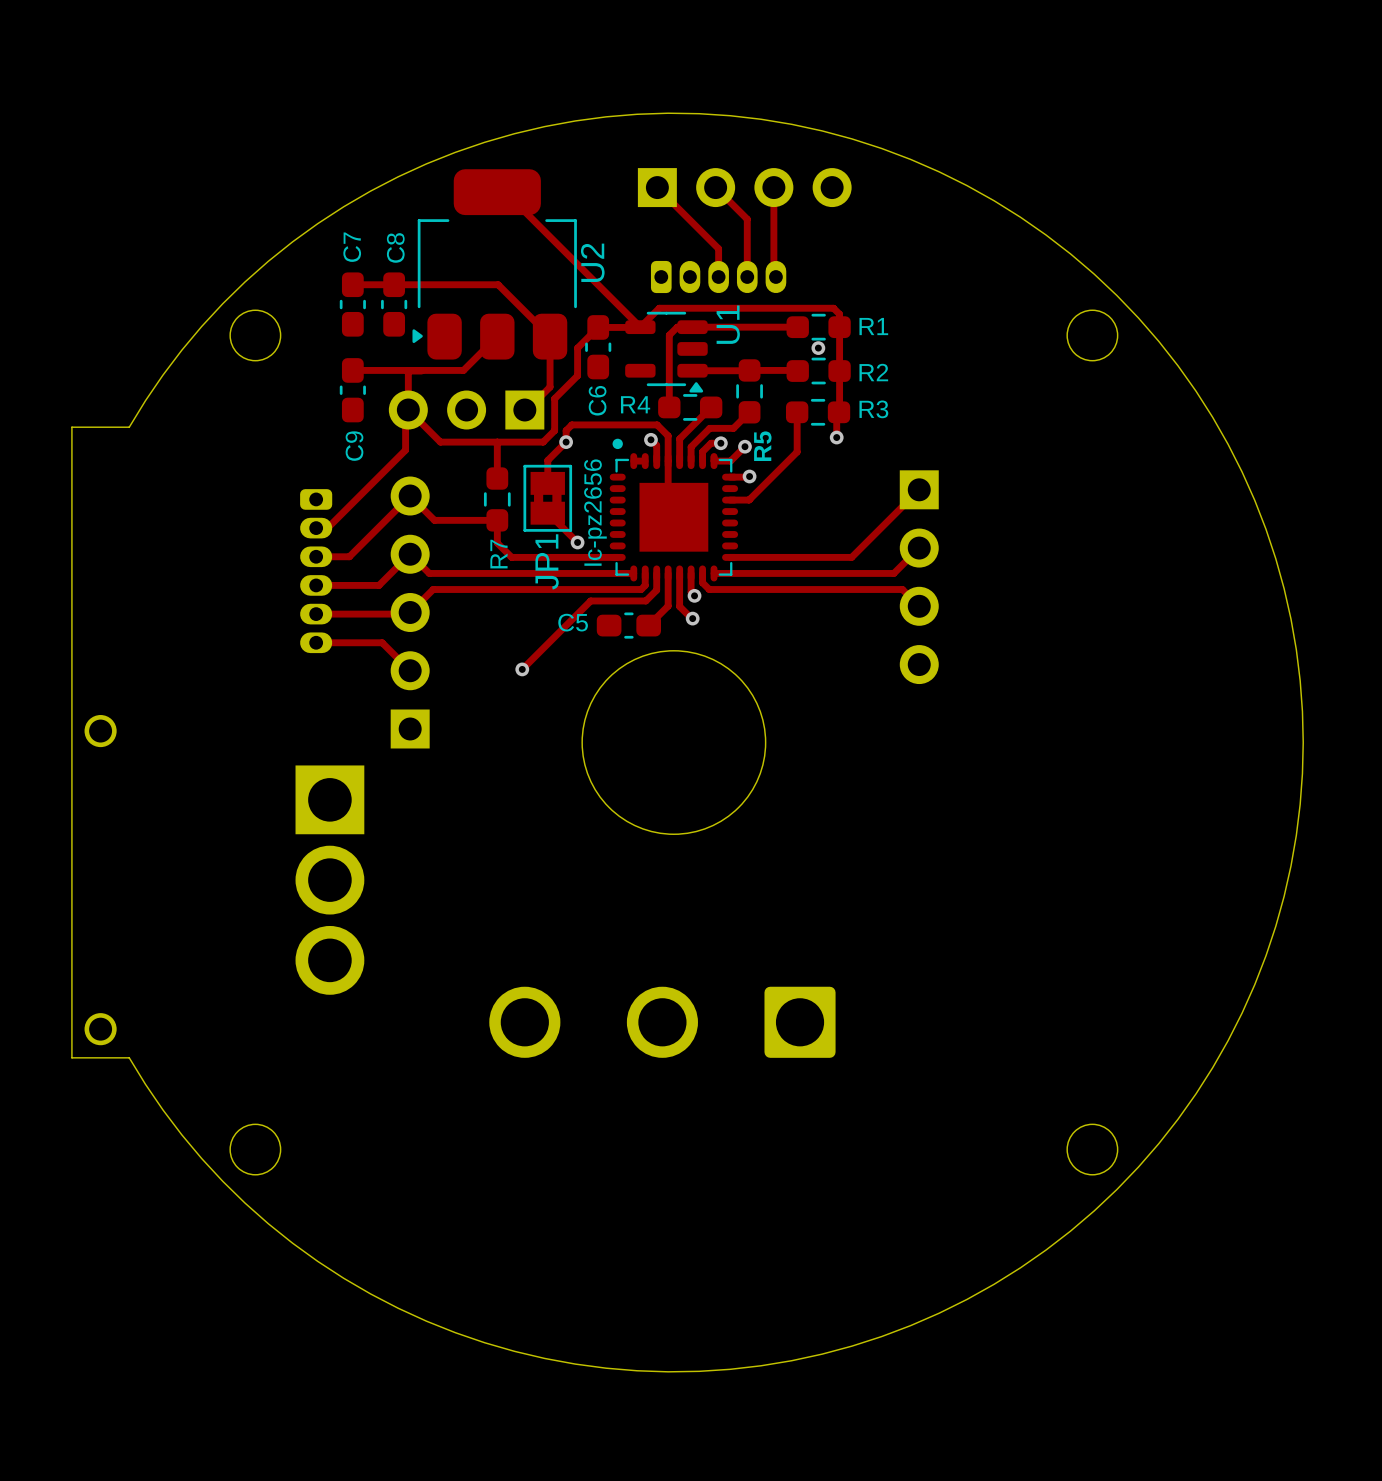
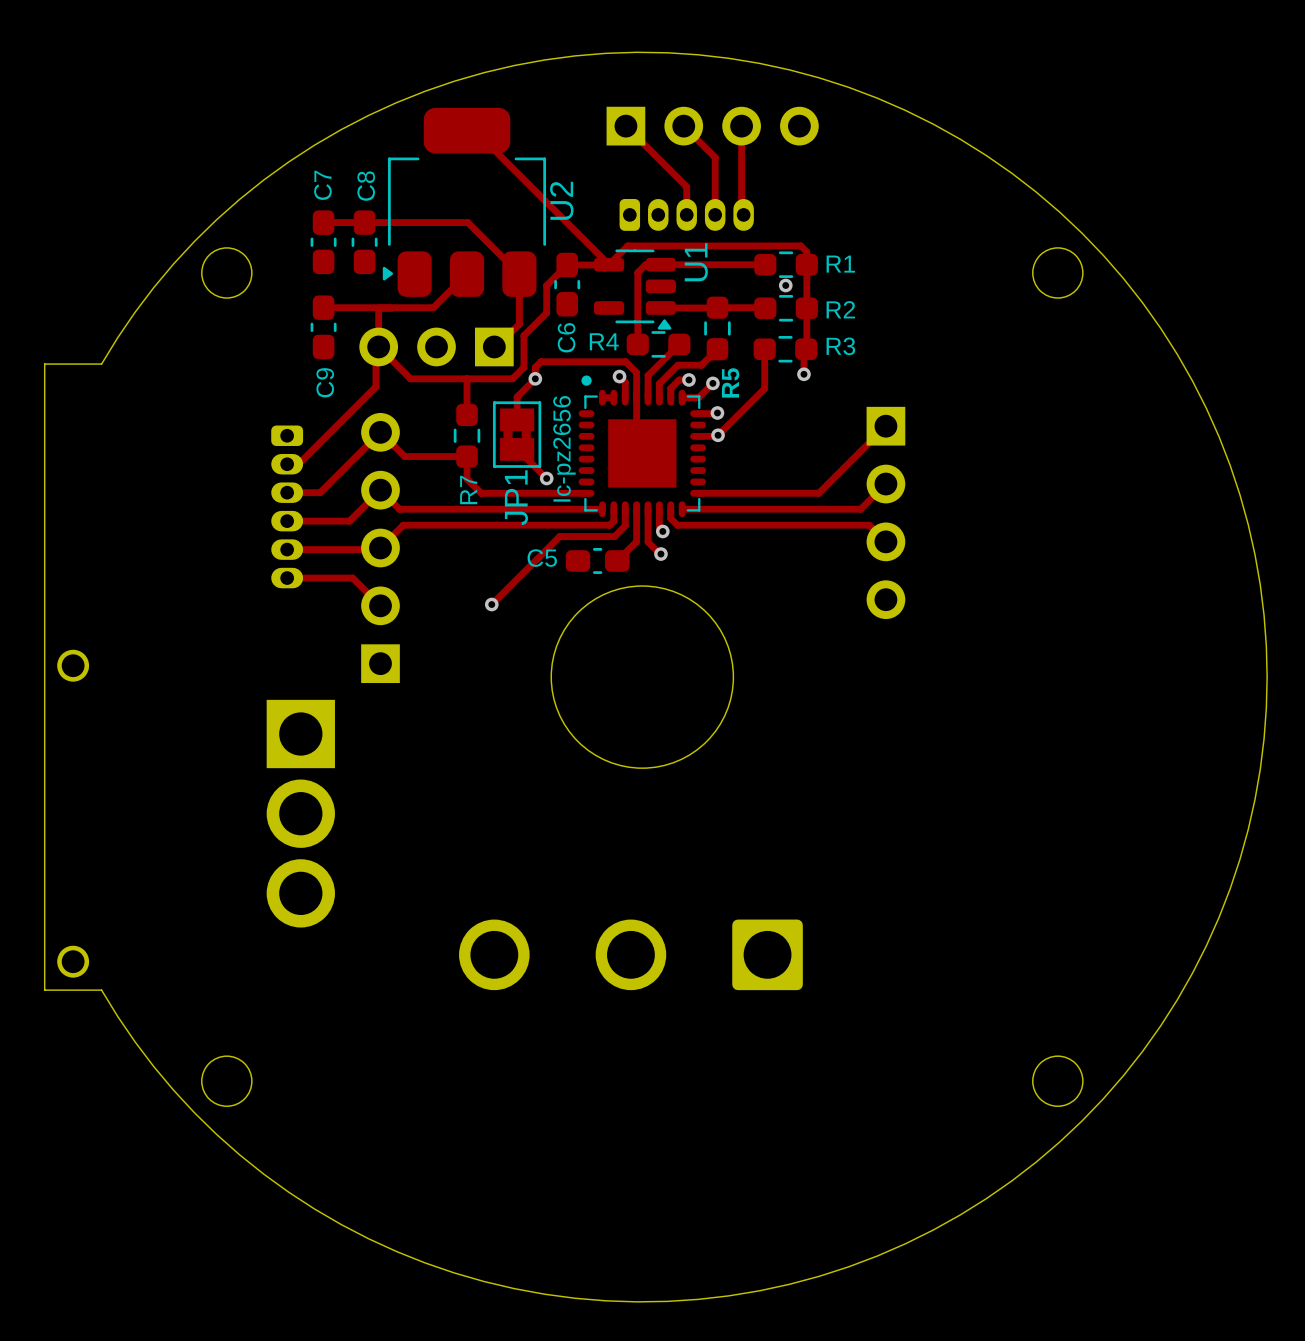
via: none -> (718, 435)

